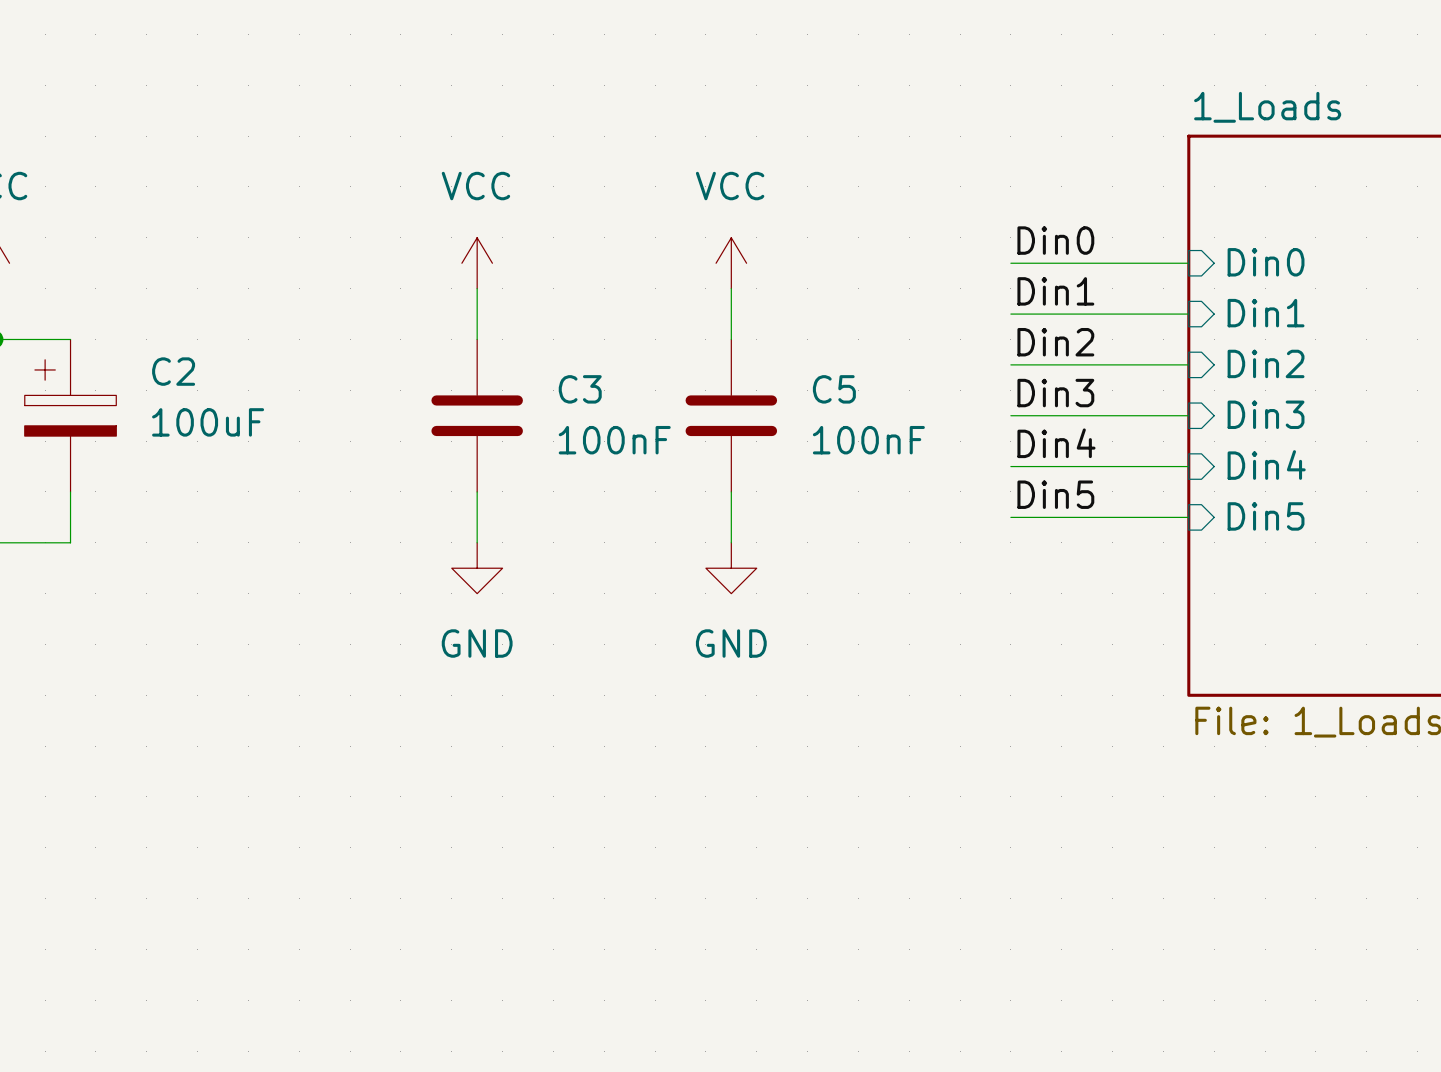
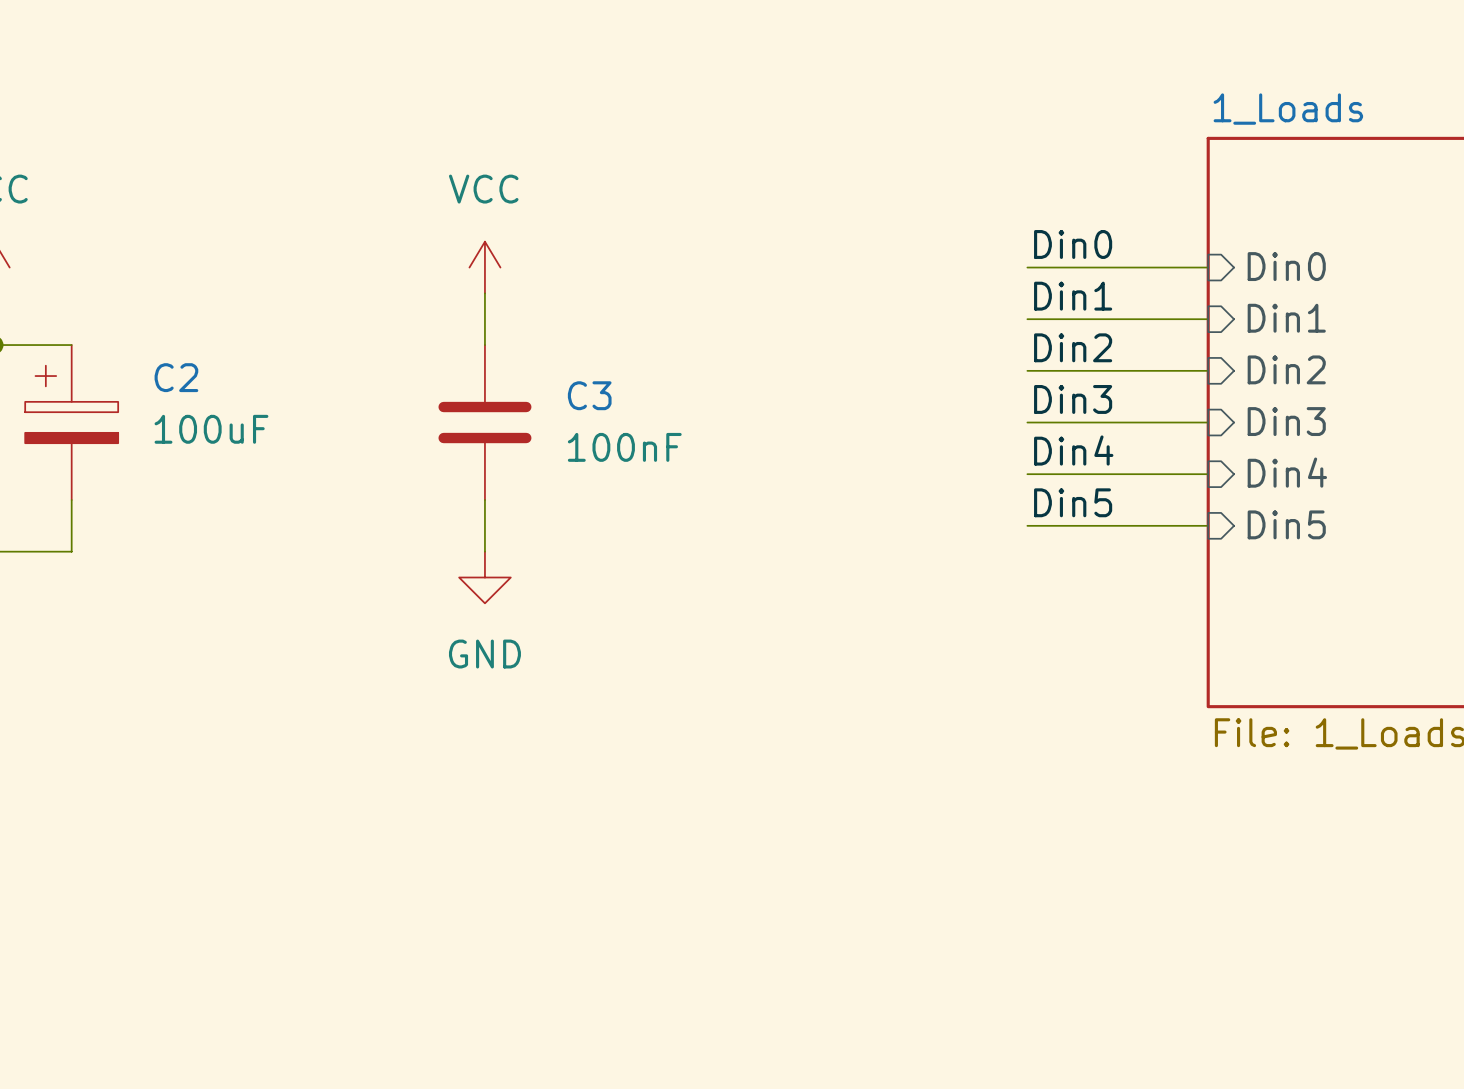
power symbol: VCC (731, 263) -> none
wire: (731, 288) (731, 339) -> none
C5: 100nF (731, 415) -> none
wire: (731, 491) (731, 542) -> none
power symbol: GND (731, 568) -> none

